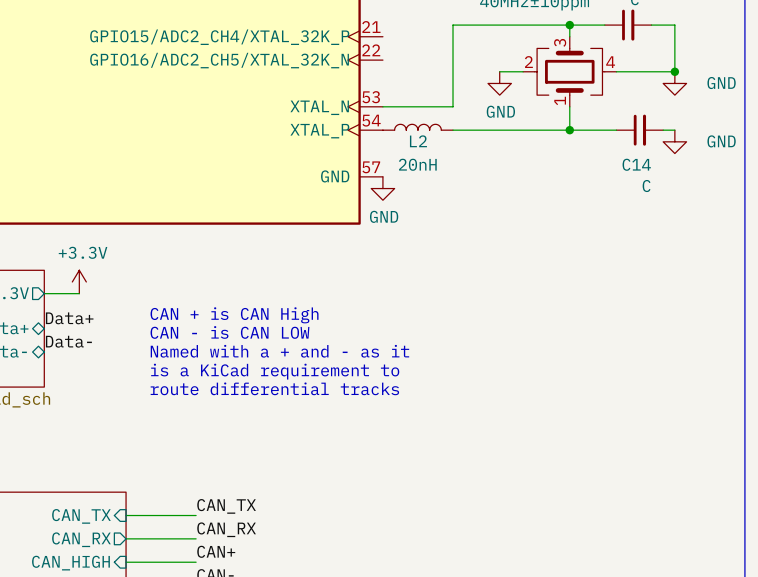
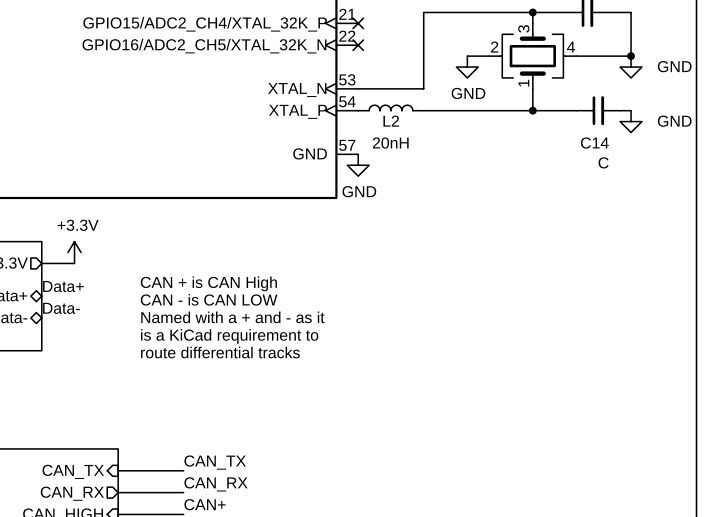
no-connect mark: none -> (358, 23)
no-connect mark: none -> (358, 45)

